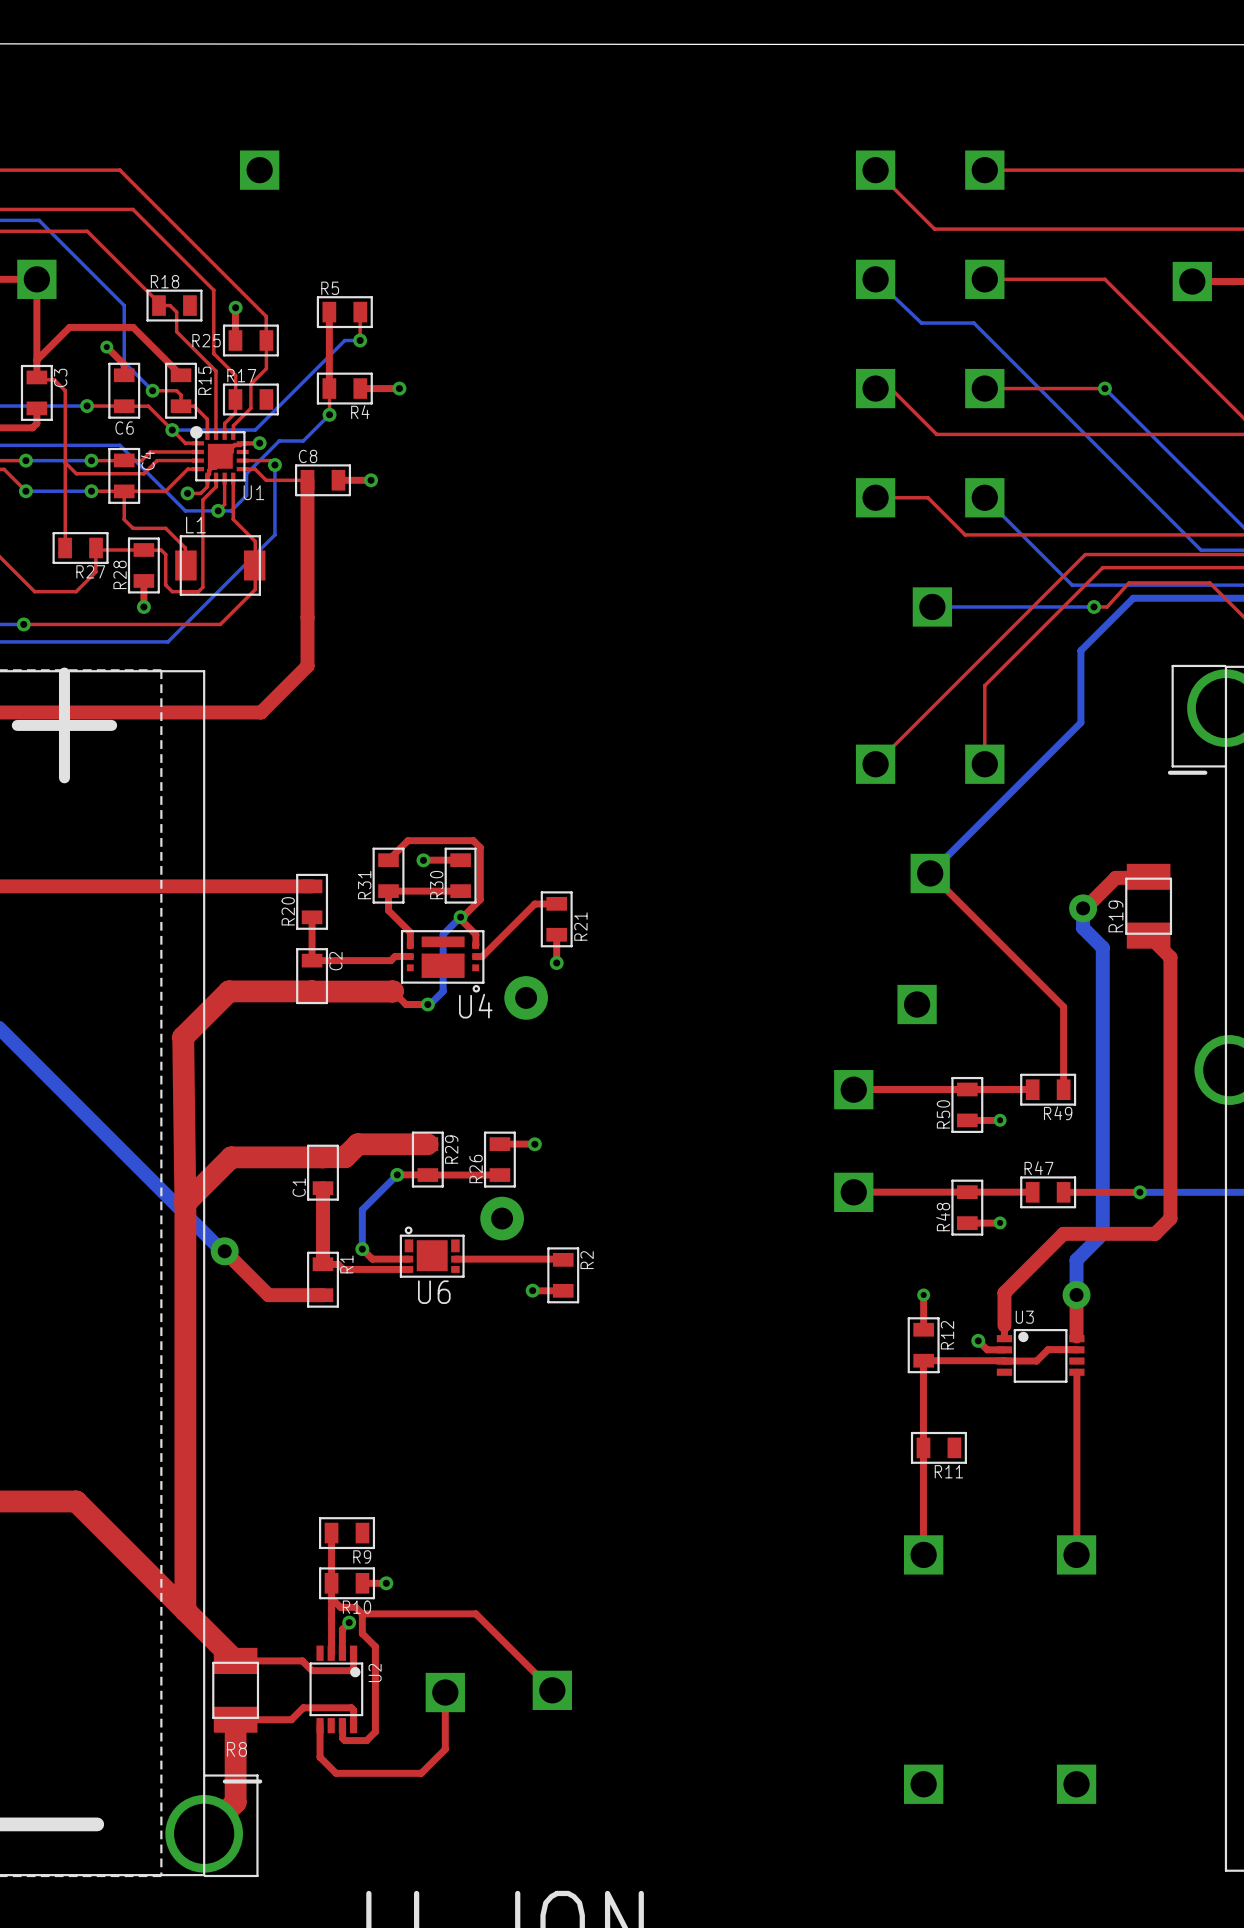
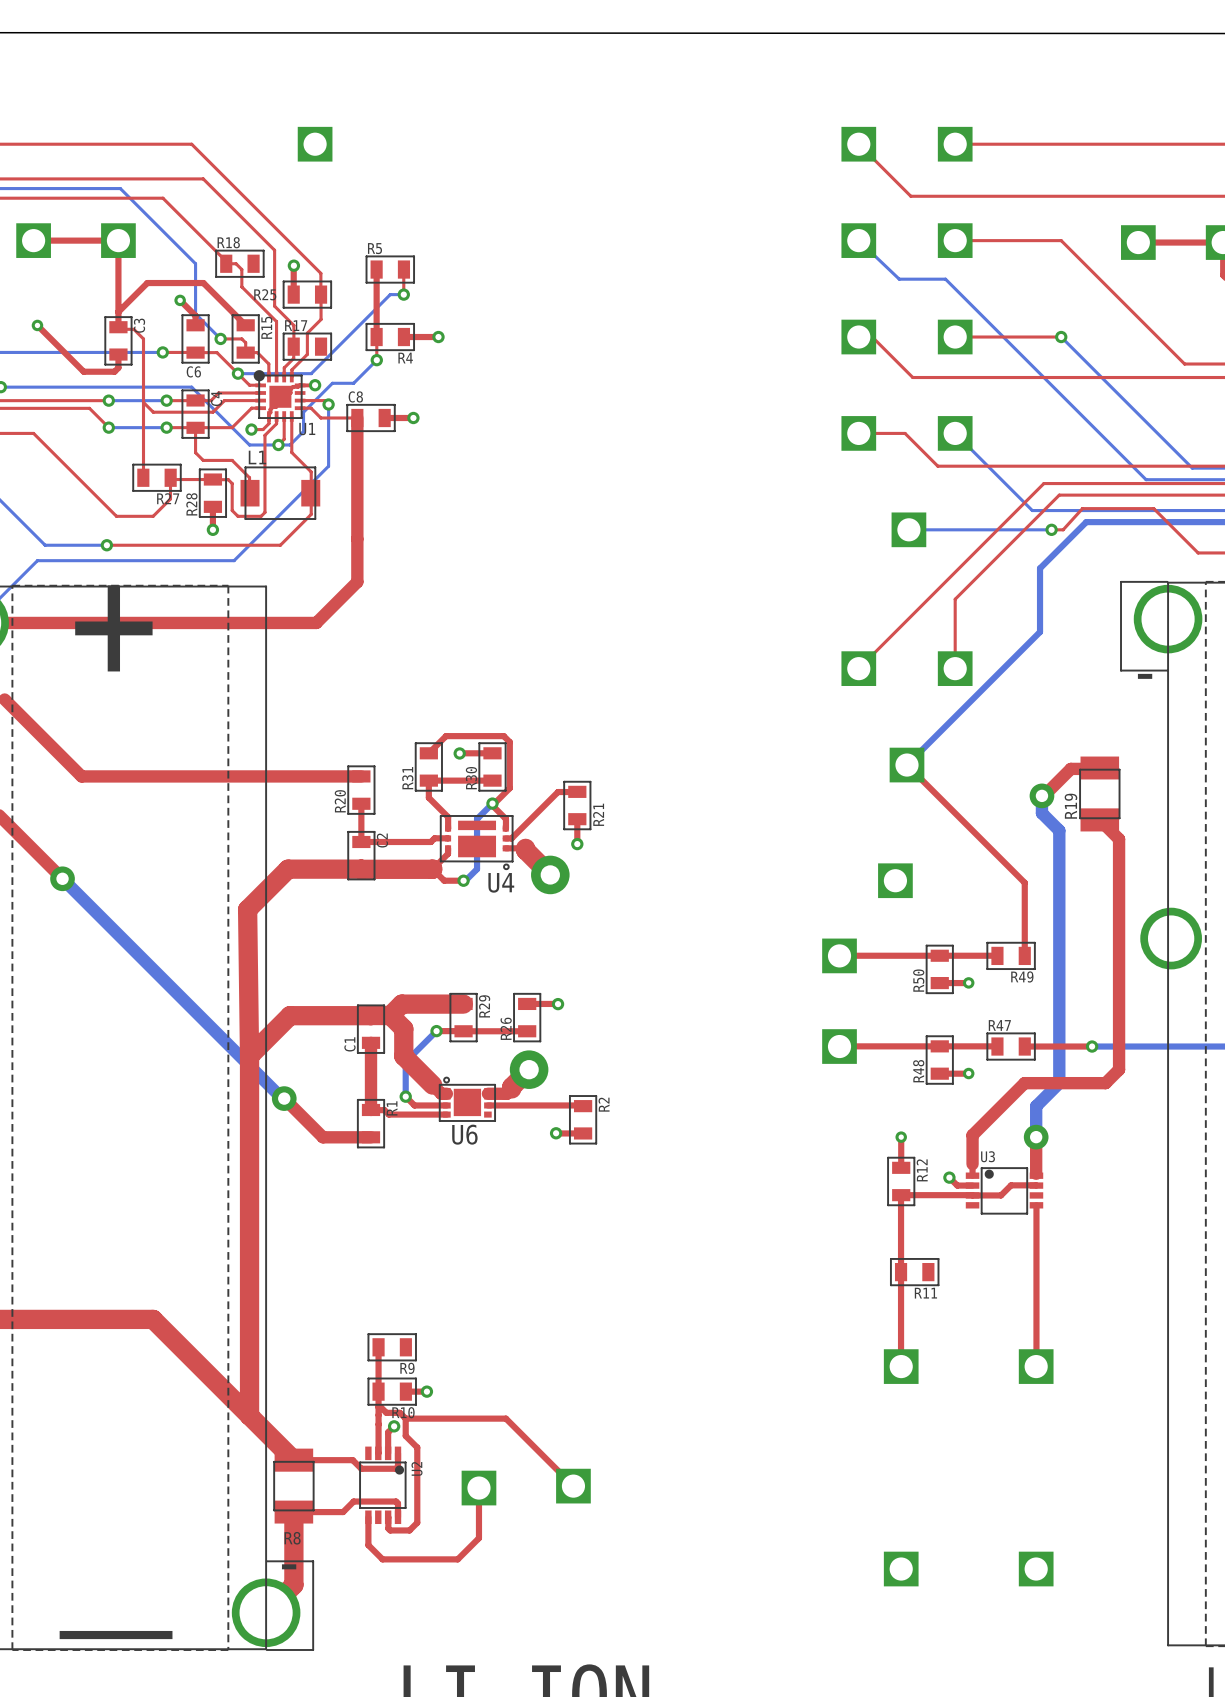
top track: none -> (448, 848) (448, 853) (432, 868)
top track: none -> (505, 848) (525, 848) (550, 874)
top track: none -> (392, 1017) (403, 1028) (403, 1056) (441, 1093) (446, 1094)
top track: none -> (529, 1069) (506, 1093) (487, 1093)

